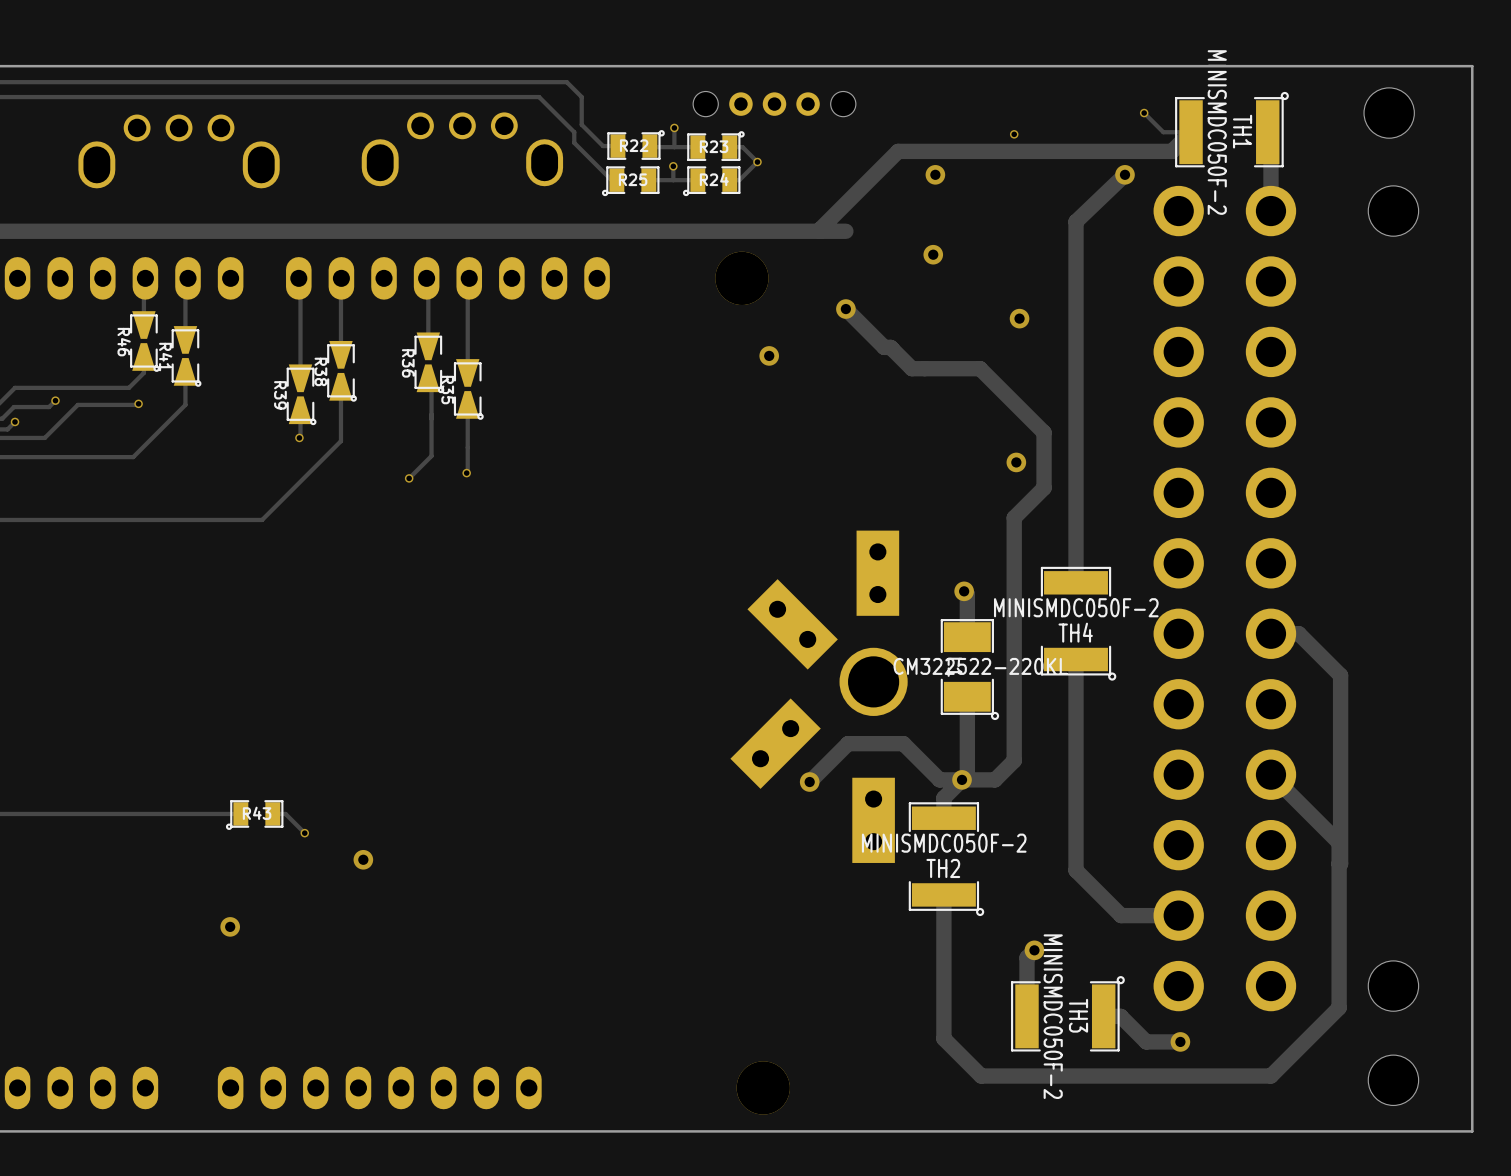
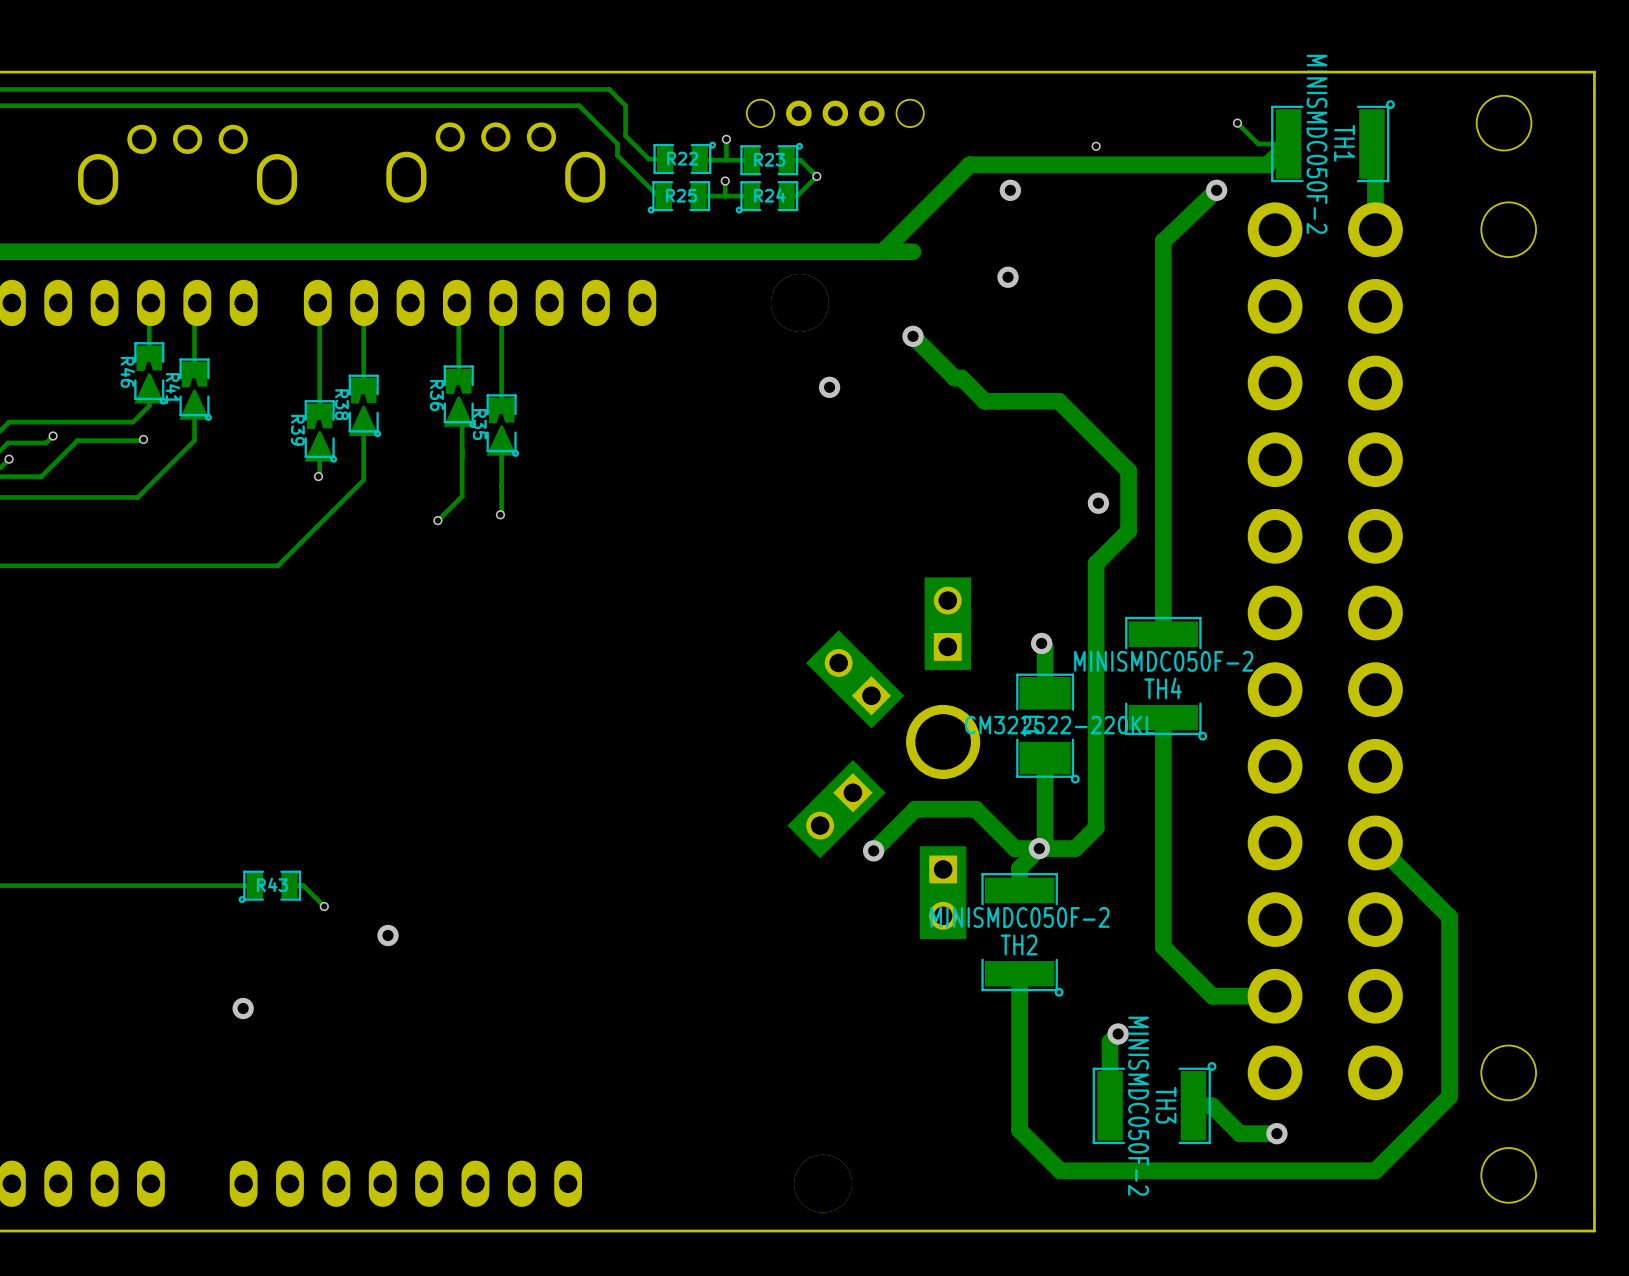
R46 footprint: [130, 311, 160, 372] -> [134, 342, 167, 405]
via: (1019, 318) -> none
R41 footprint: [171, 326, 202, 387] -> [179, 358, 212, 421]
R36 footprint: [414, 332, 445, 394] -> [443, 365, 477, 428]
R38 footprint: [327, 341, 357, 402] -> [348, 374, 382, 438]
R35 footprint: [453, 359, 484, 420] -> [486, 394, 519, 457]
R39 footprint: [286, 364, 317, 426] -> [304, 400, 338, 463]
track: (1270, 633) (1298, 633) (1340, 675) (1339, 863) -> none

